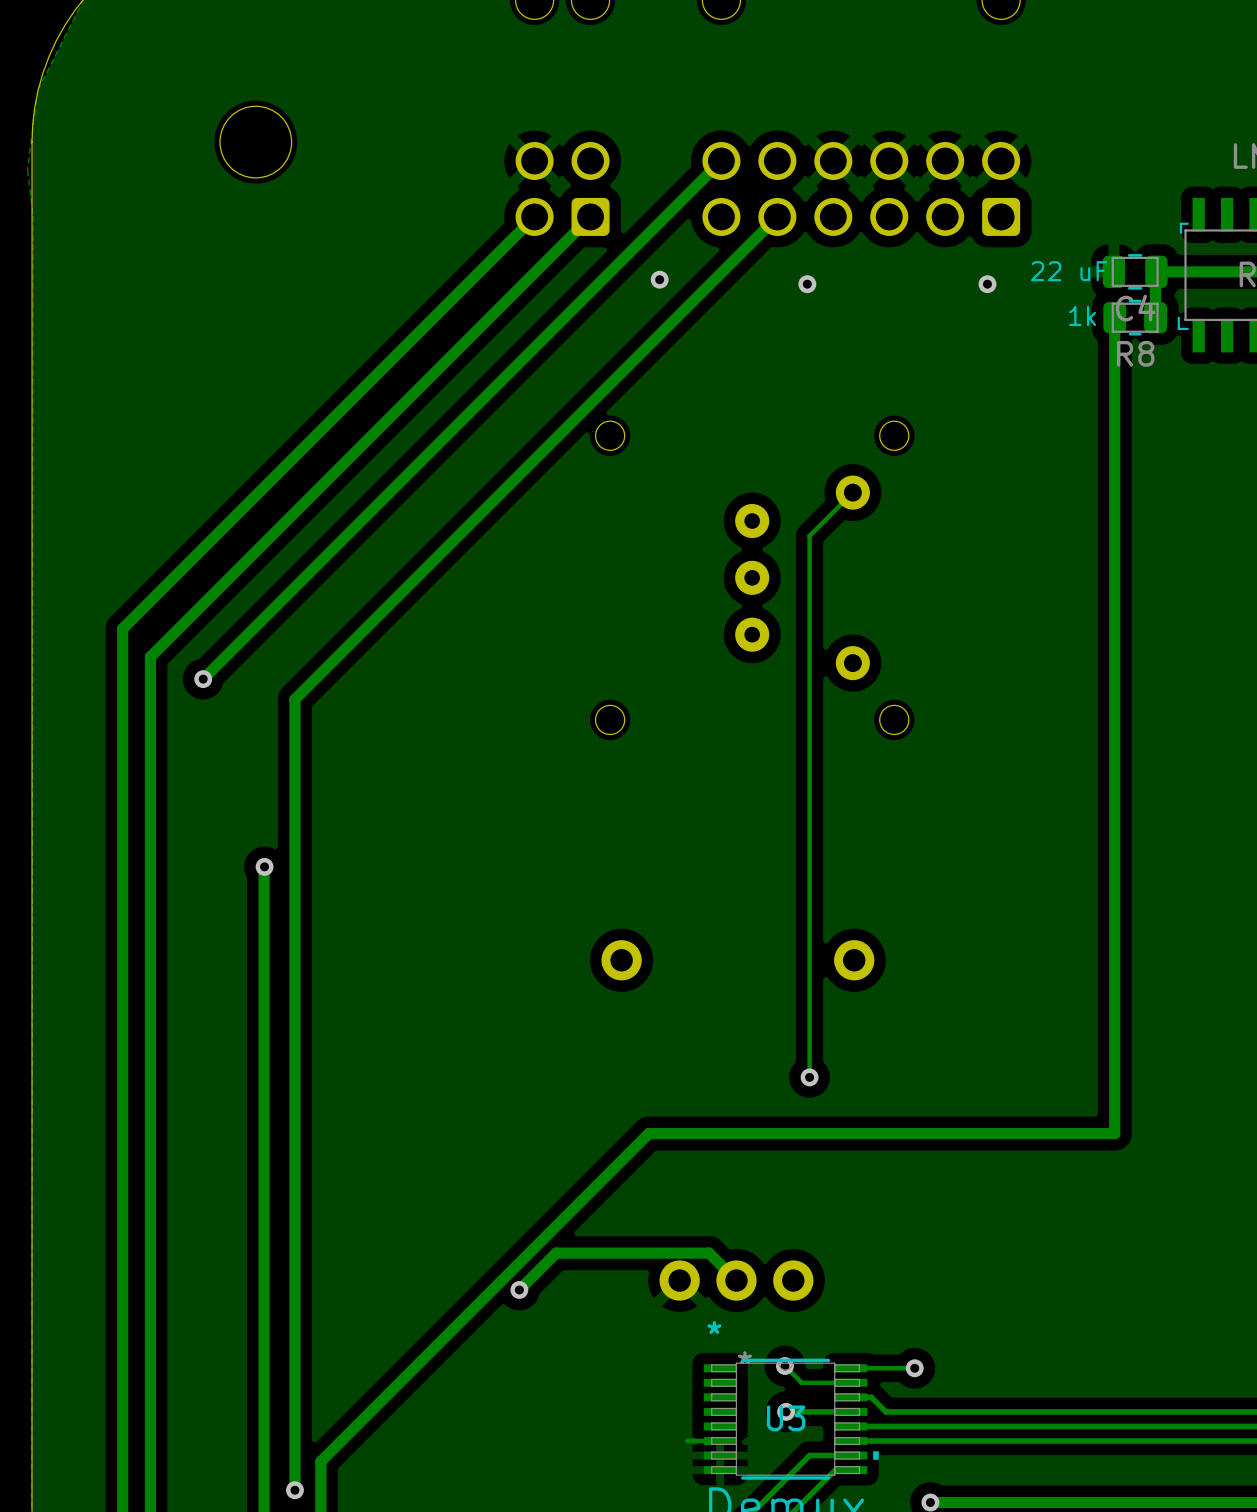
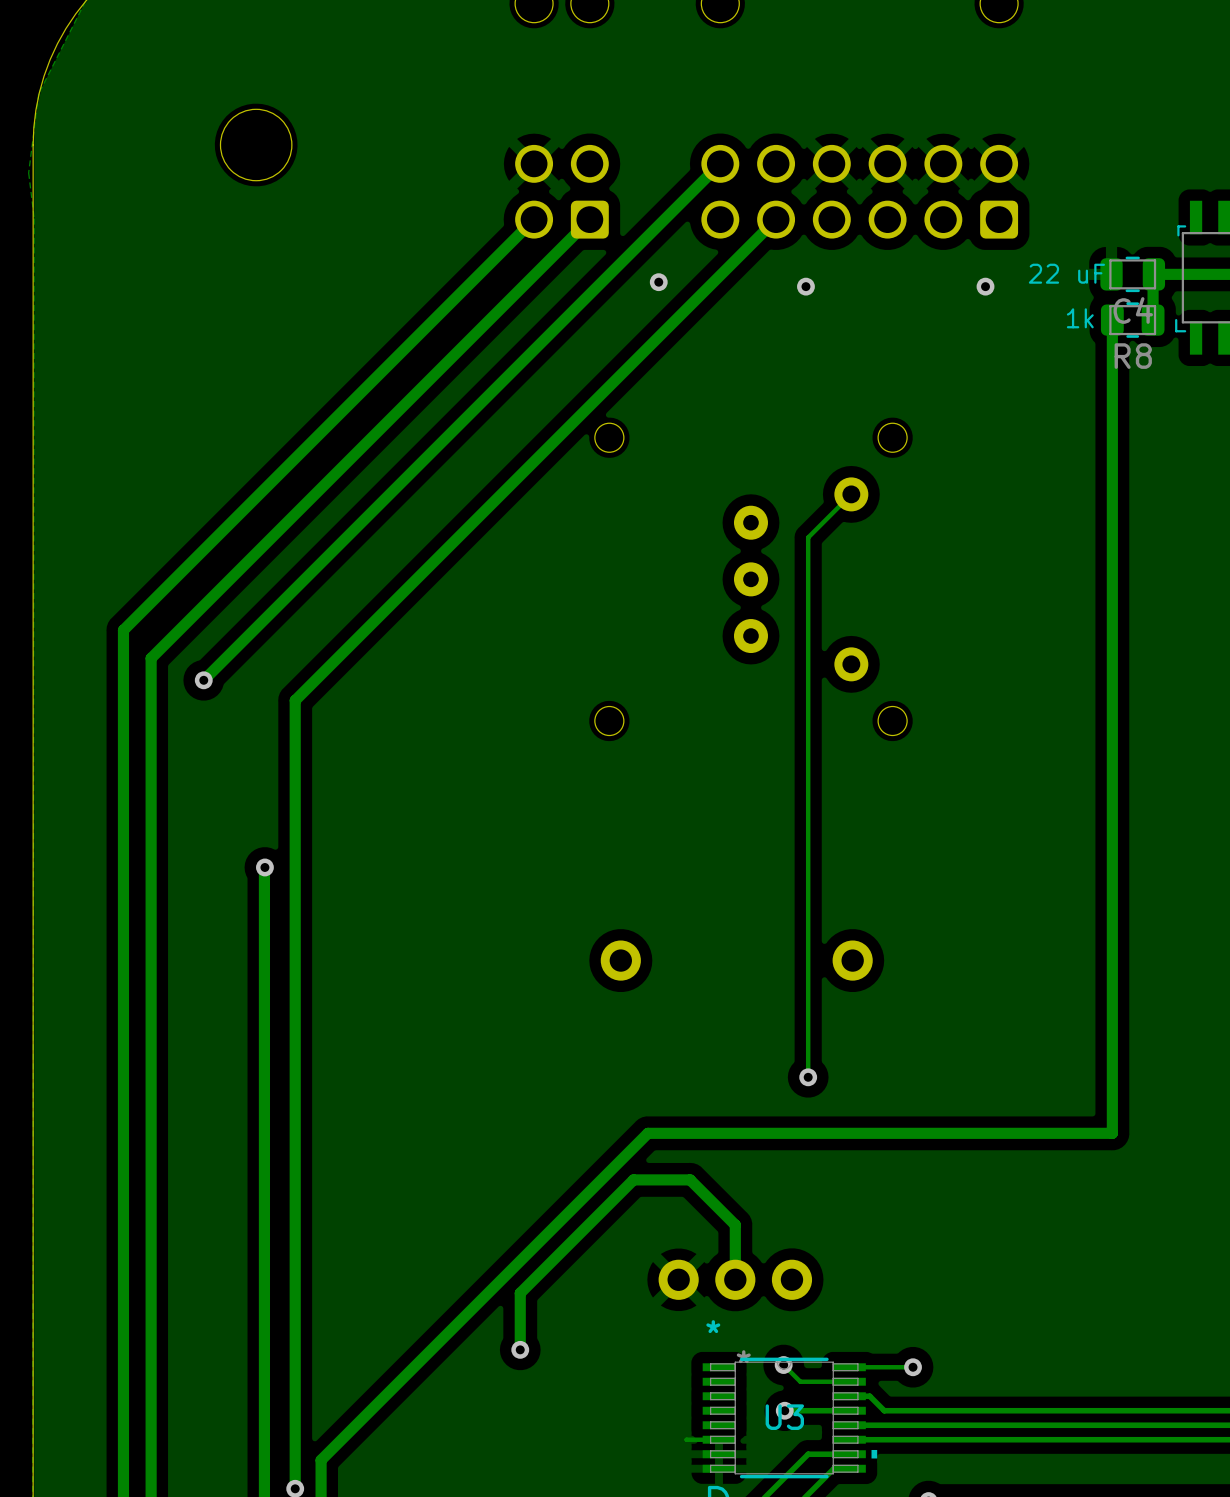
track: (736, 1280) (709, 1253) (556, 1253) (519, 1289) -> (735, 1279) (735, 1225) (690, 1179) (633, 1179) (520, 1293) (520, 1349)
via position: (519, 1289) -> (520, 1349)

